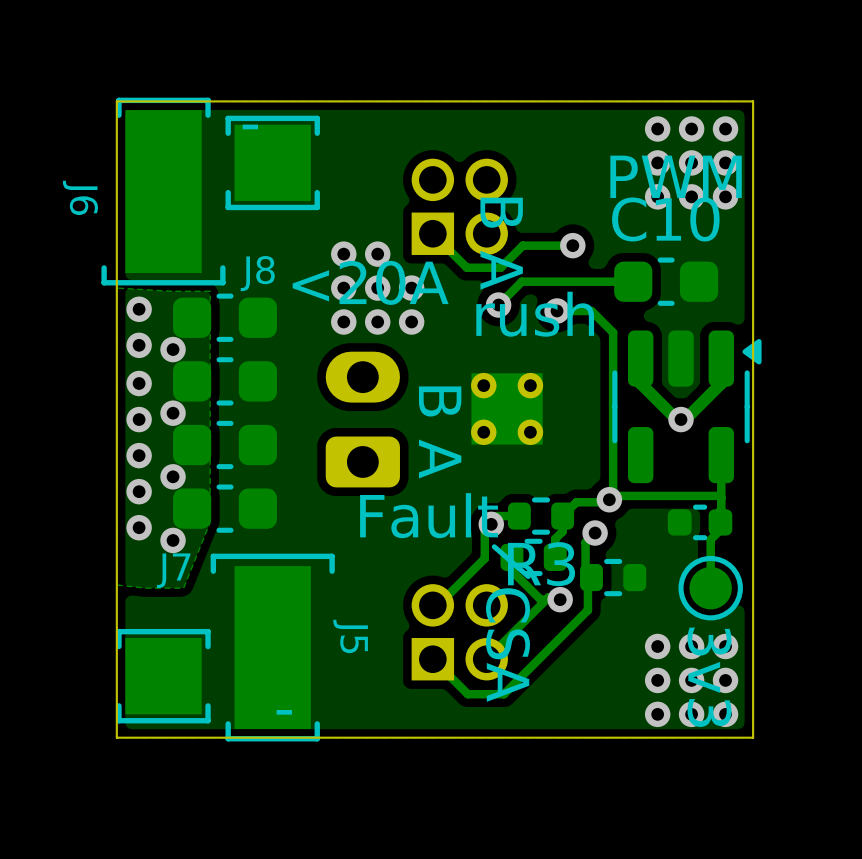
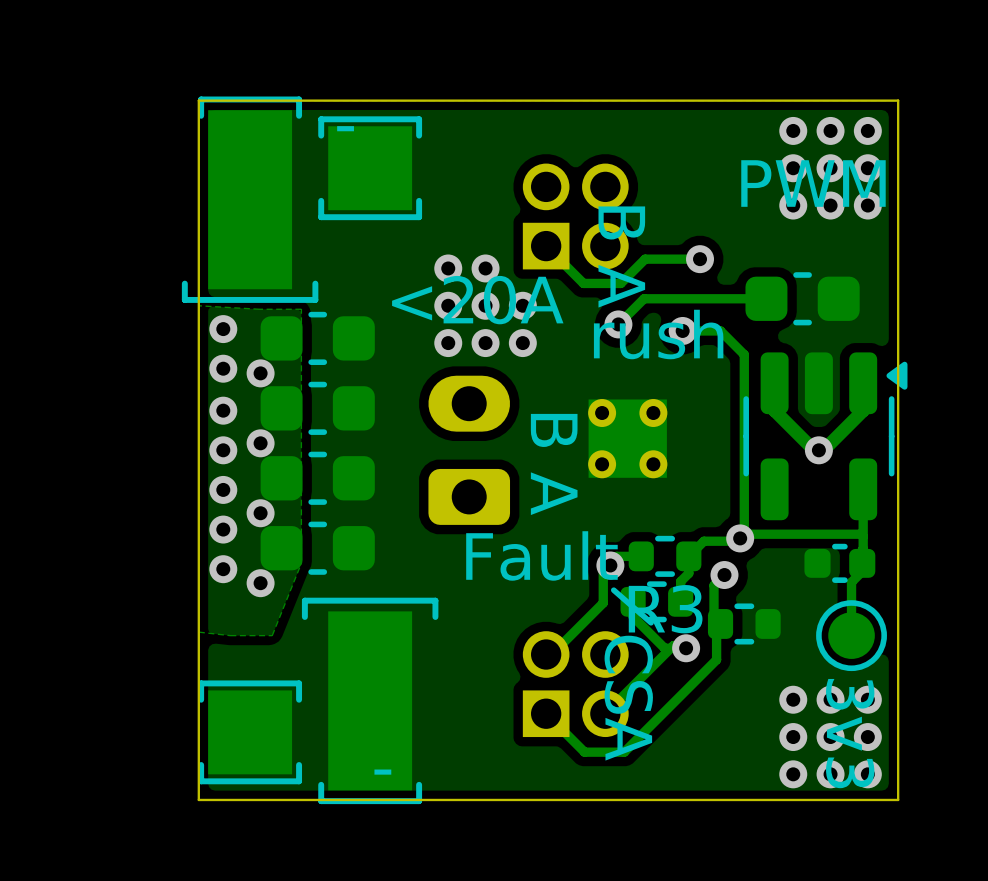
J6 name: J6 (80, 197) -> none
C10 name: C10 (665, 219) -> none
J8 name: J8 (257, 273) -> none
J7 name: J7 (173, 570) -> none
J5 name: J5 (350, 636) -> none

